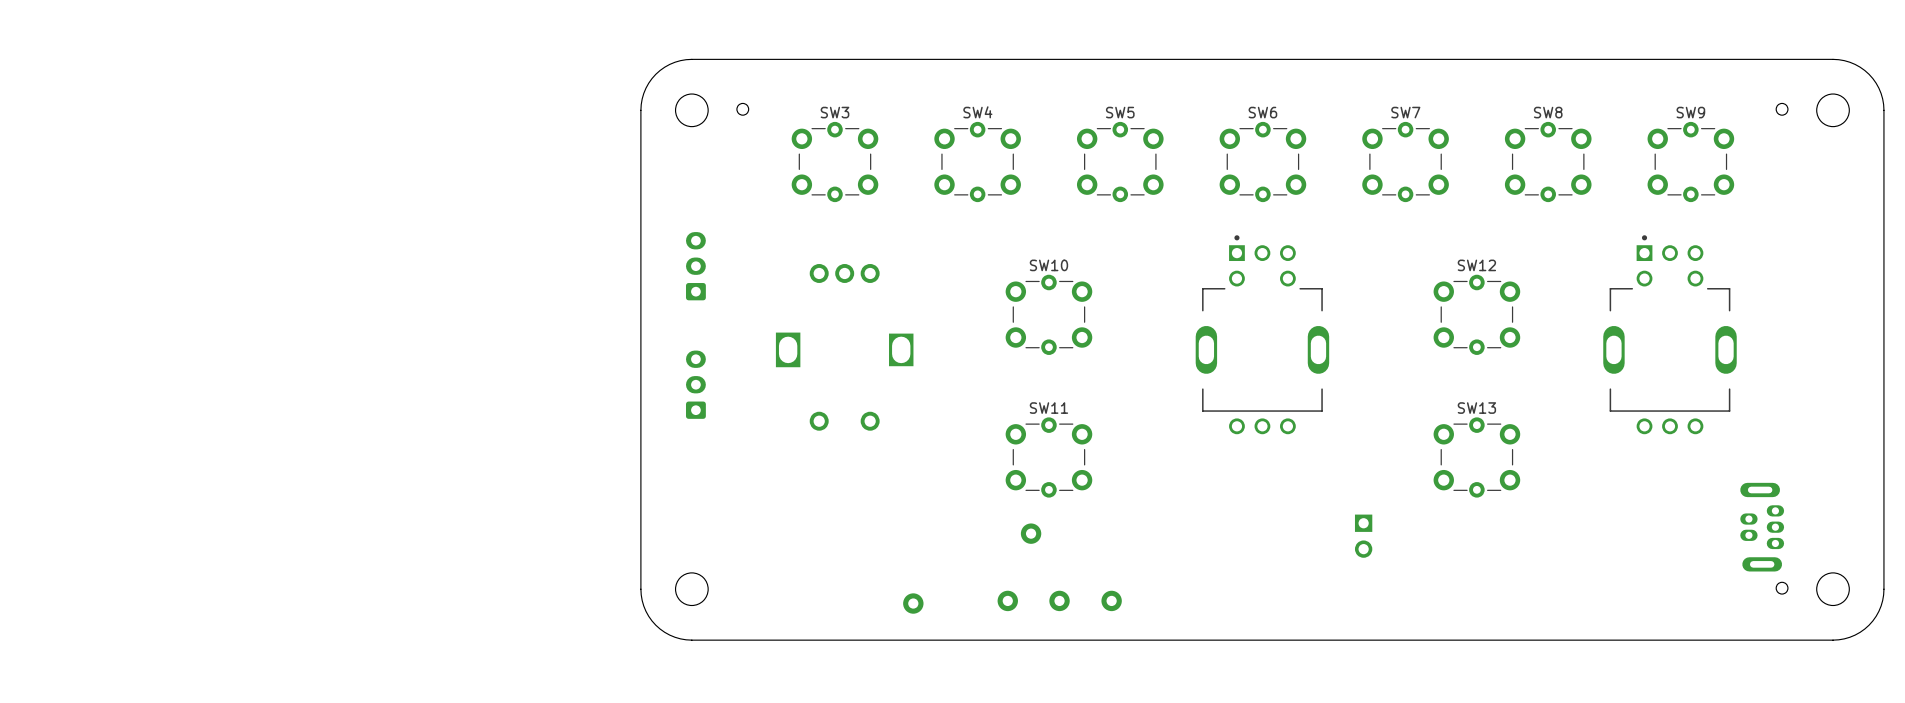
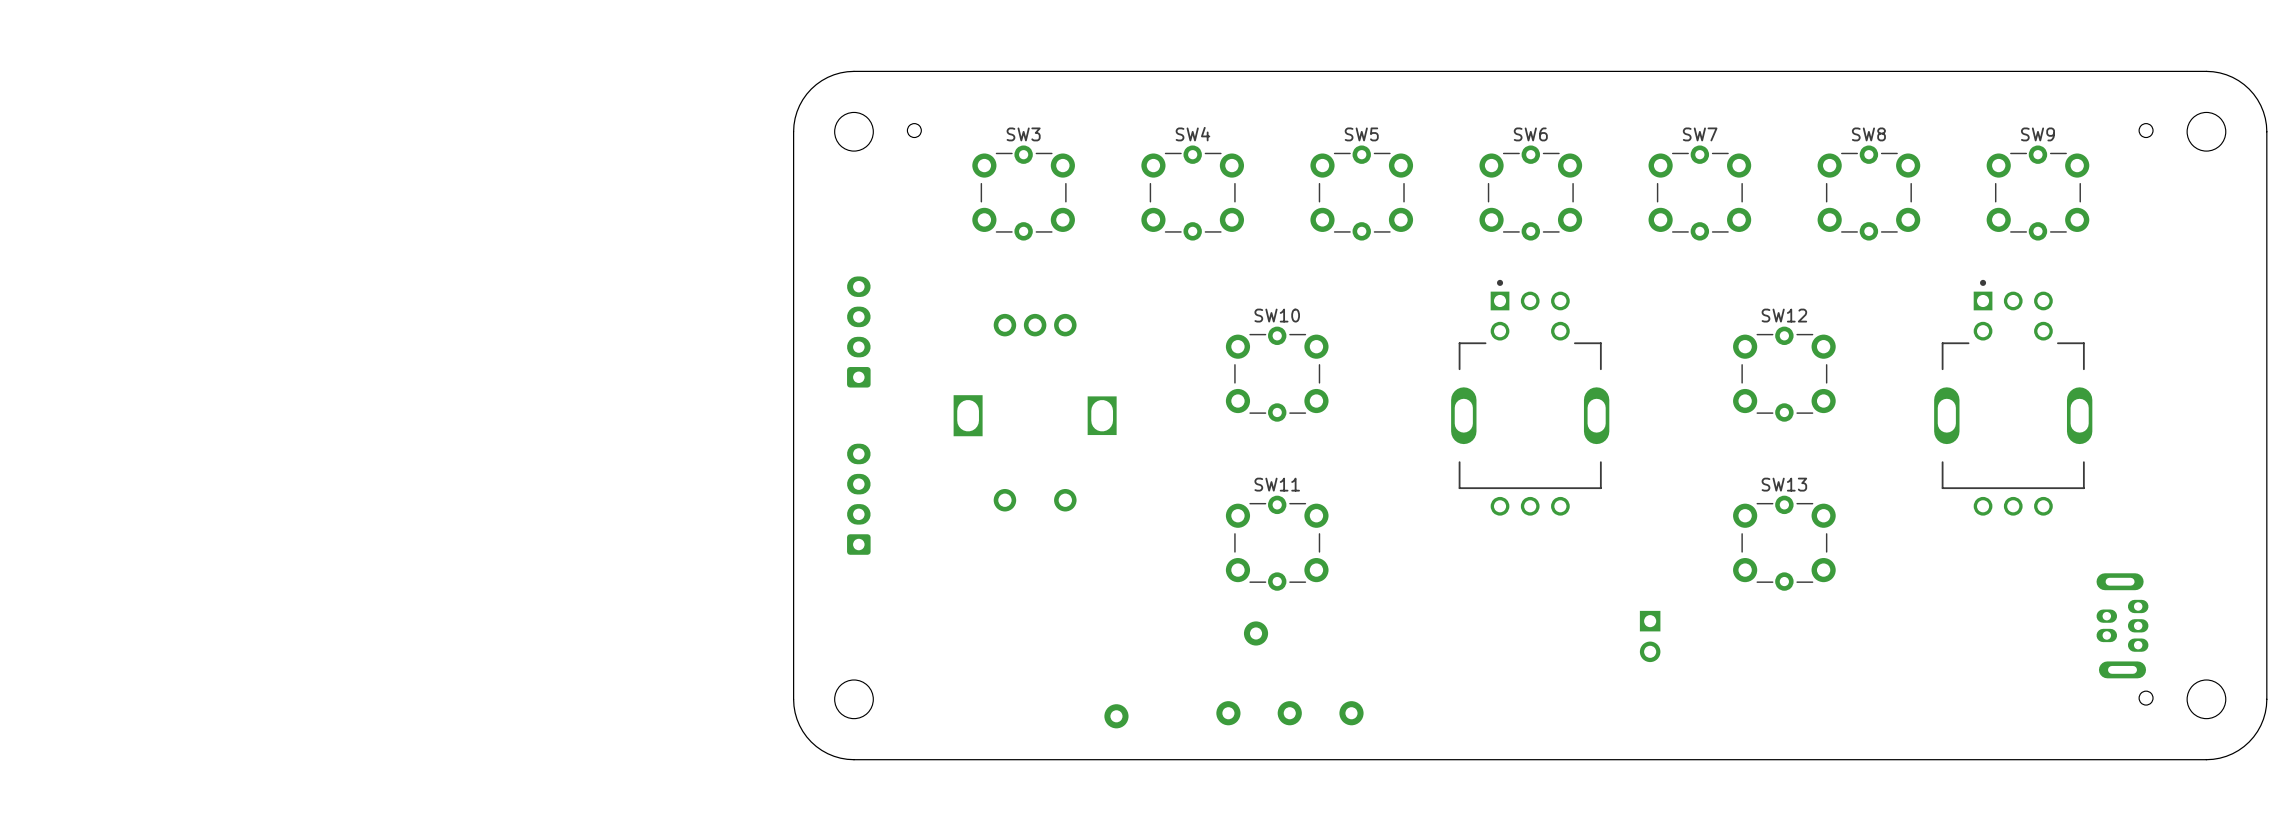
part: (695, 266) -> none
part: none -> (858, 331)
part: (695, 384) -> none
part: none -> (858, 499)

